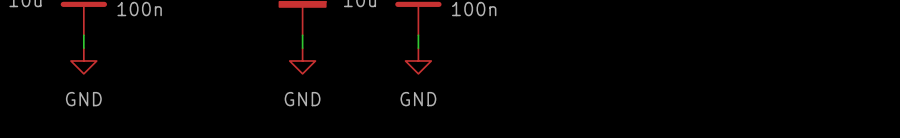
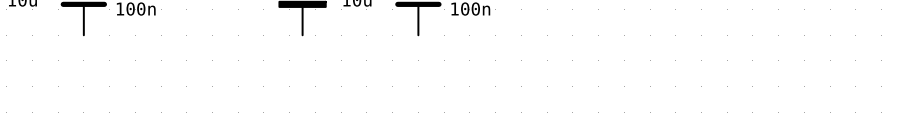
wire: (83, 35) (83, 48) -> none
wire: (302, 35) (302, 48) -> none
wire: (418, 35) (418, 48) -> none
power symbol: GND (83, 60) -> none
power symbol: GND (302, 60) -> none
power symbol: GND (418, 60) -> none

